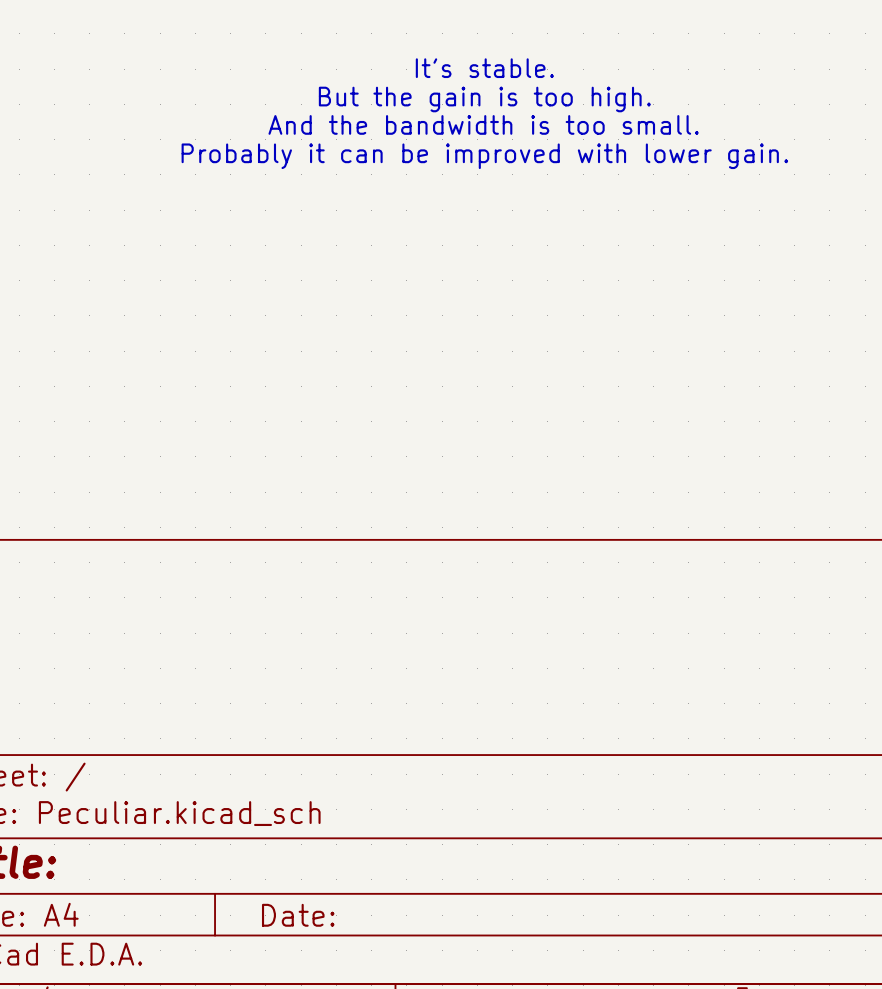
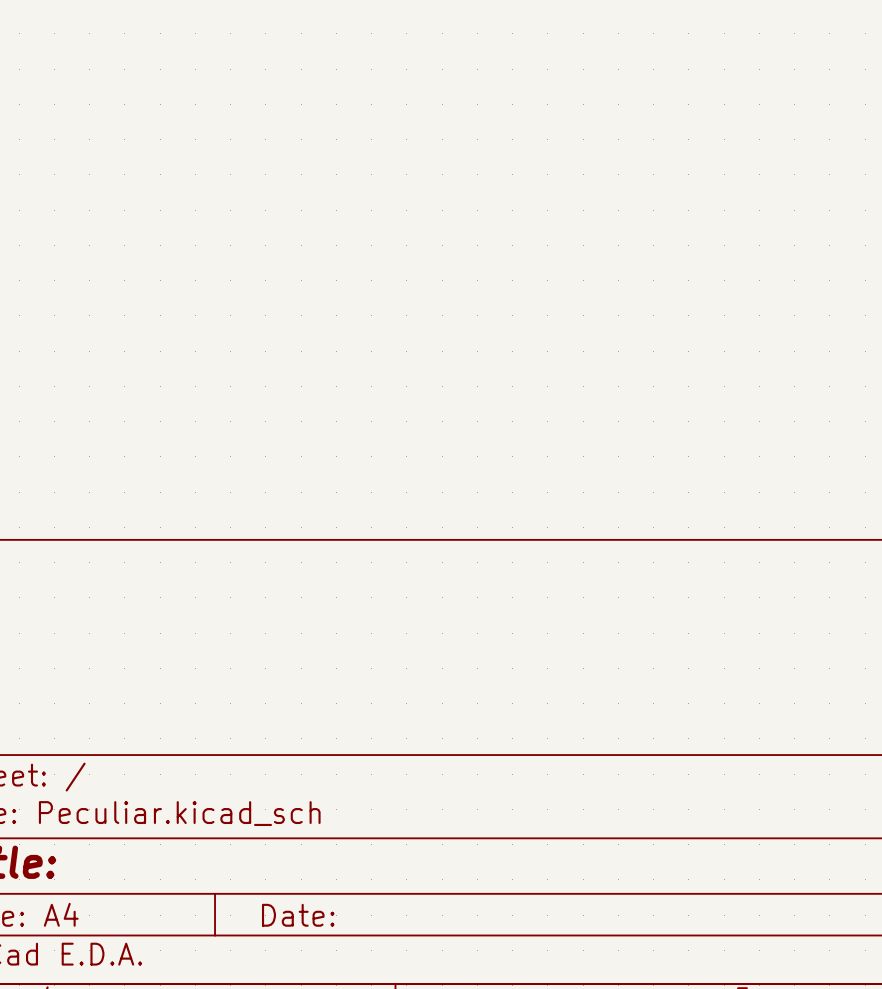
text: It's stable. (484, 68) -> none
text: But the gain is too high. (484, 99) -> none
text: And the bandwidth is too small. (483, 124) -> none
text: Probably it can be improved with lower gain. (484, 156) -> none

